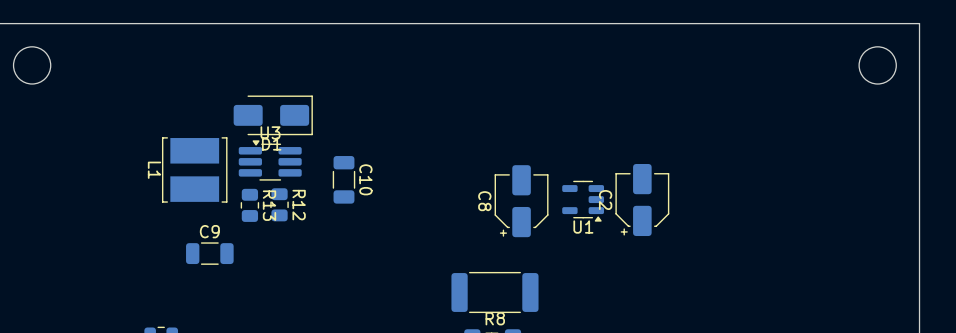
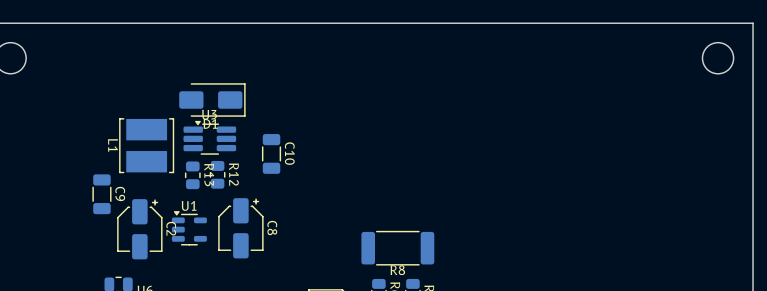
C2 rotation: 0° (642, 200) -> 180° (139, 229)
C2 position: (642, 200) -> (139, 229)
C8 rotation: 0° (521, 201) -> 180° (240, 228)
C8 position: (521, 201) -> (240, 228)
U1 rotation: 0° (583, 201) -> 180° (189, 228)
U1 position: (583, 201) -> (189, 228)
C9 rotation: 0° (209, 253) -> 90° clockwise (101, 194)
C9 position: (209, 253) -> (101, 194)

